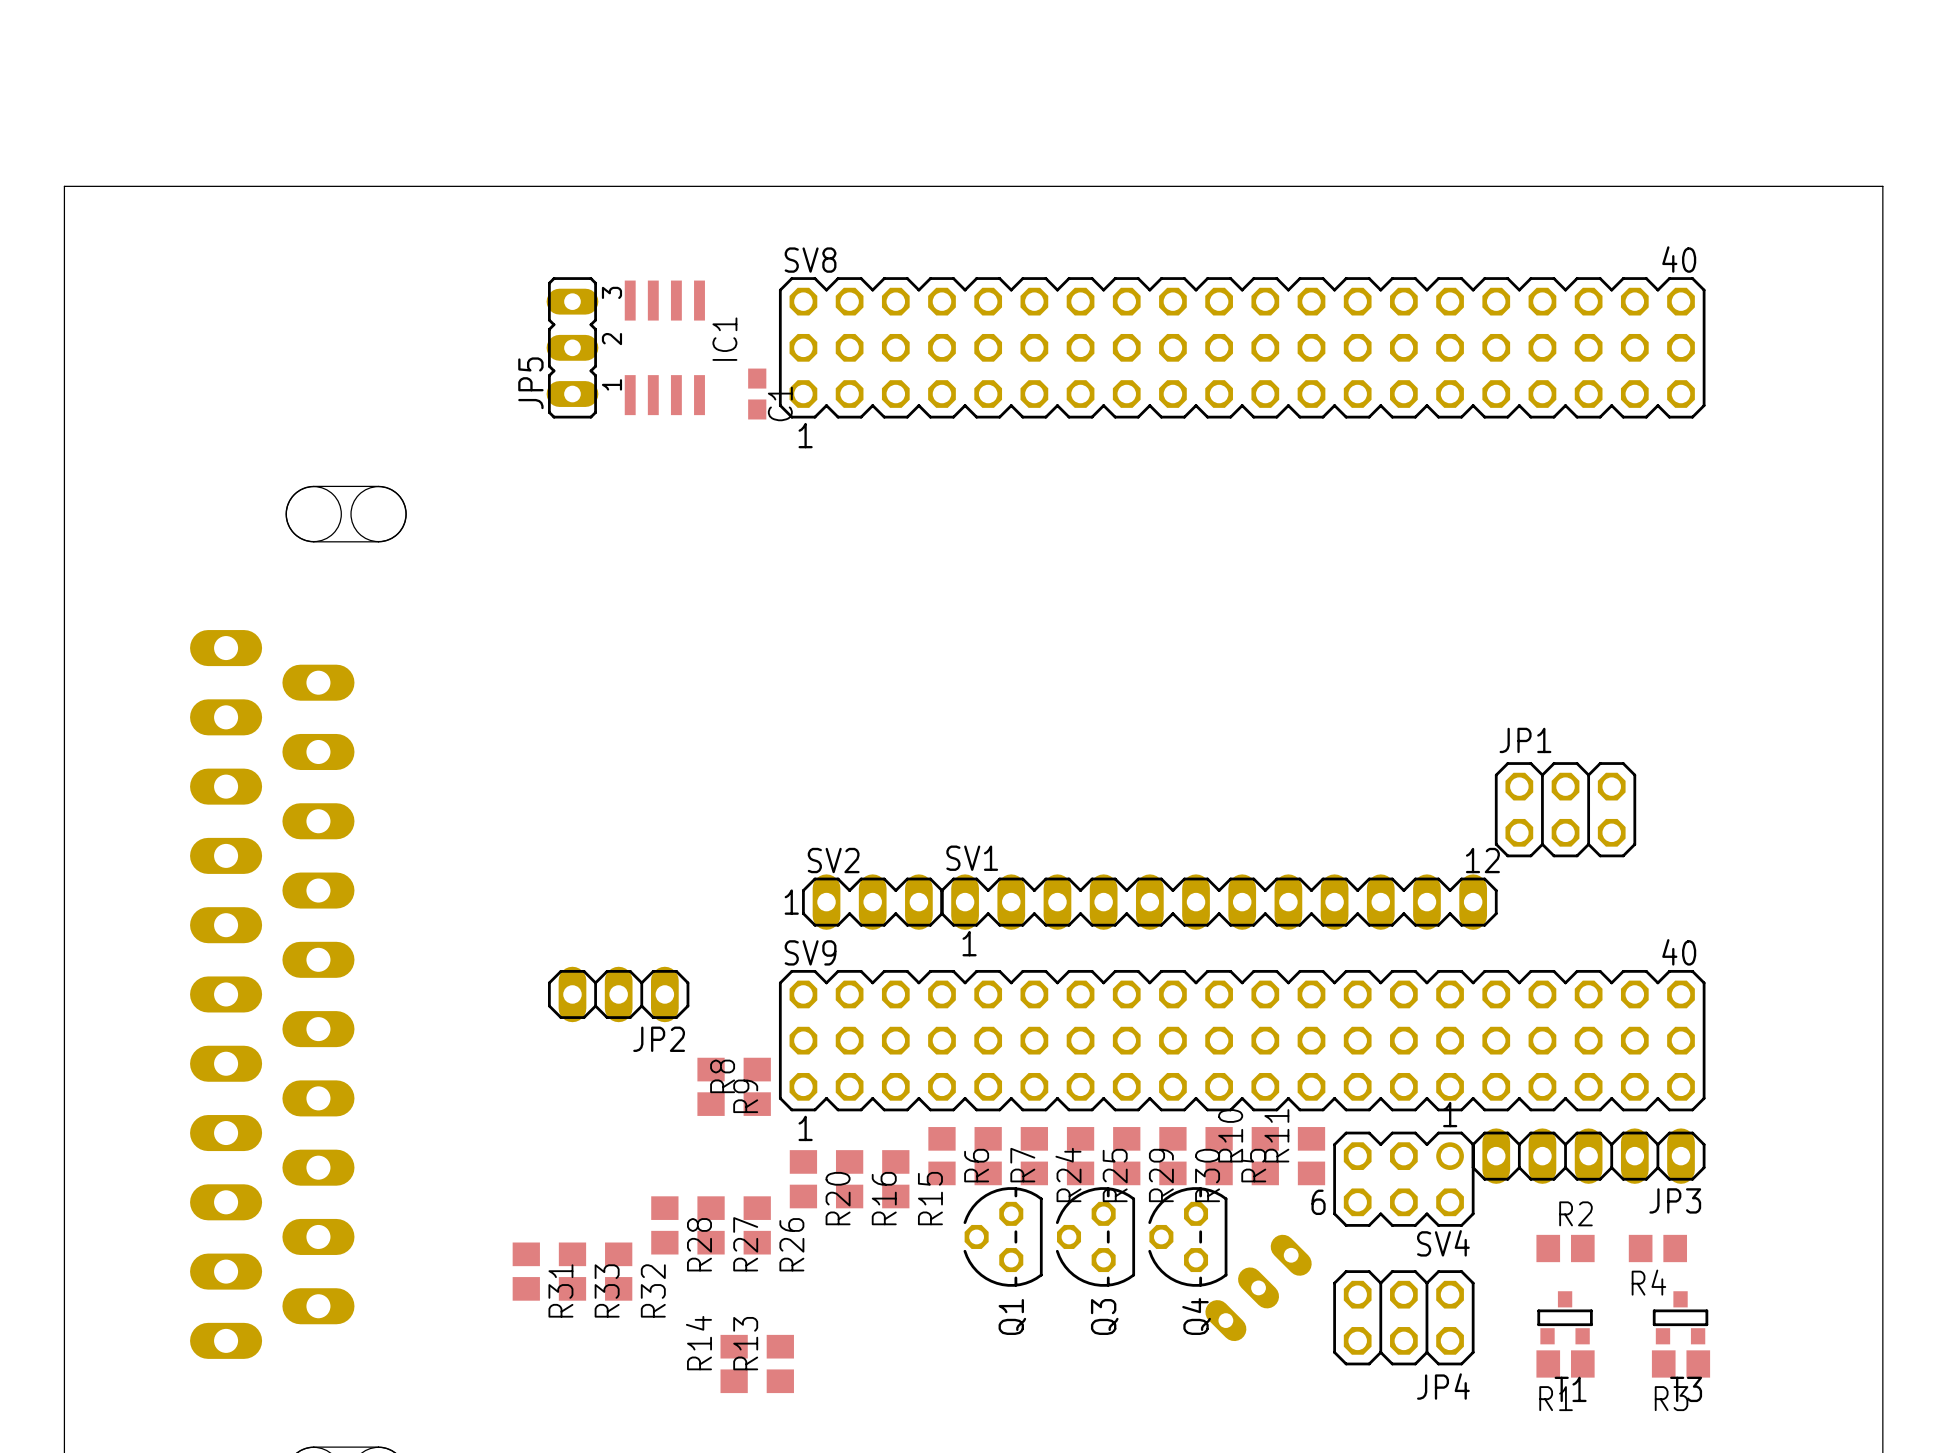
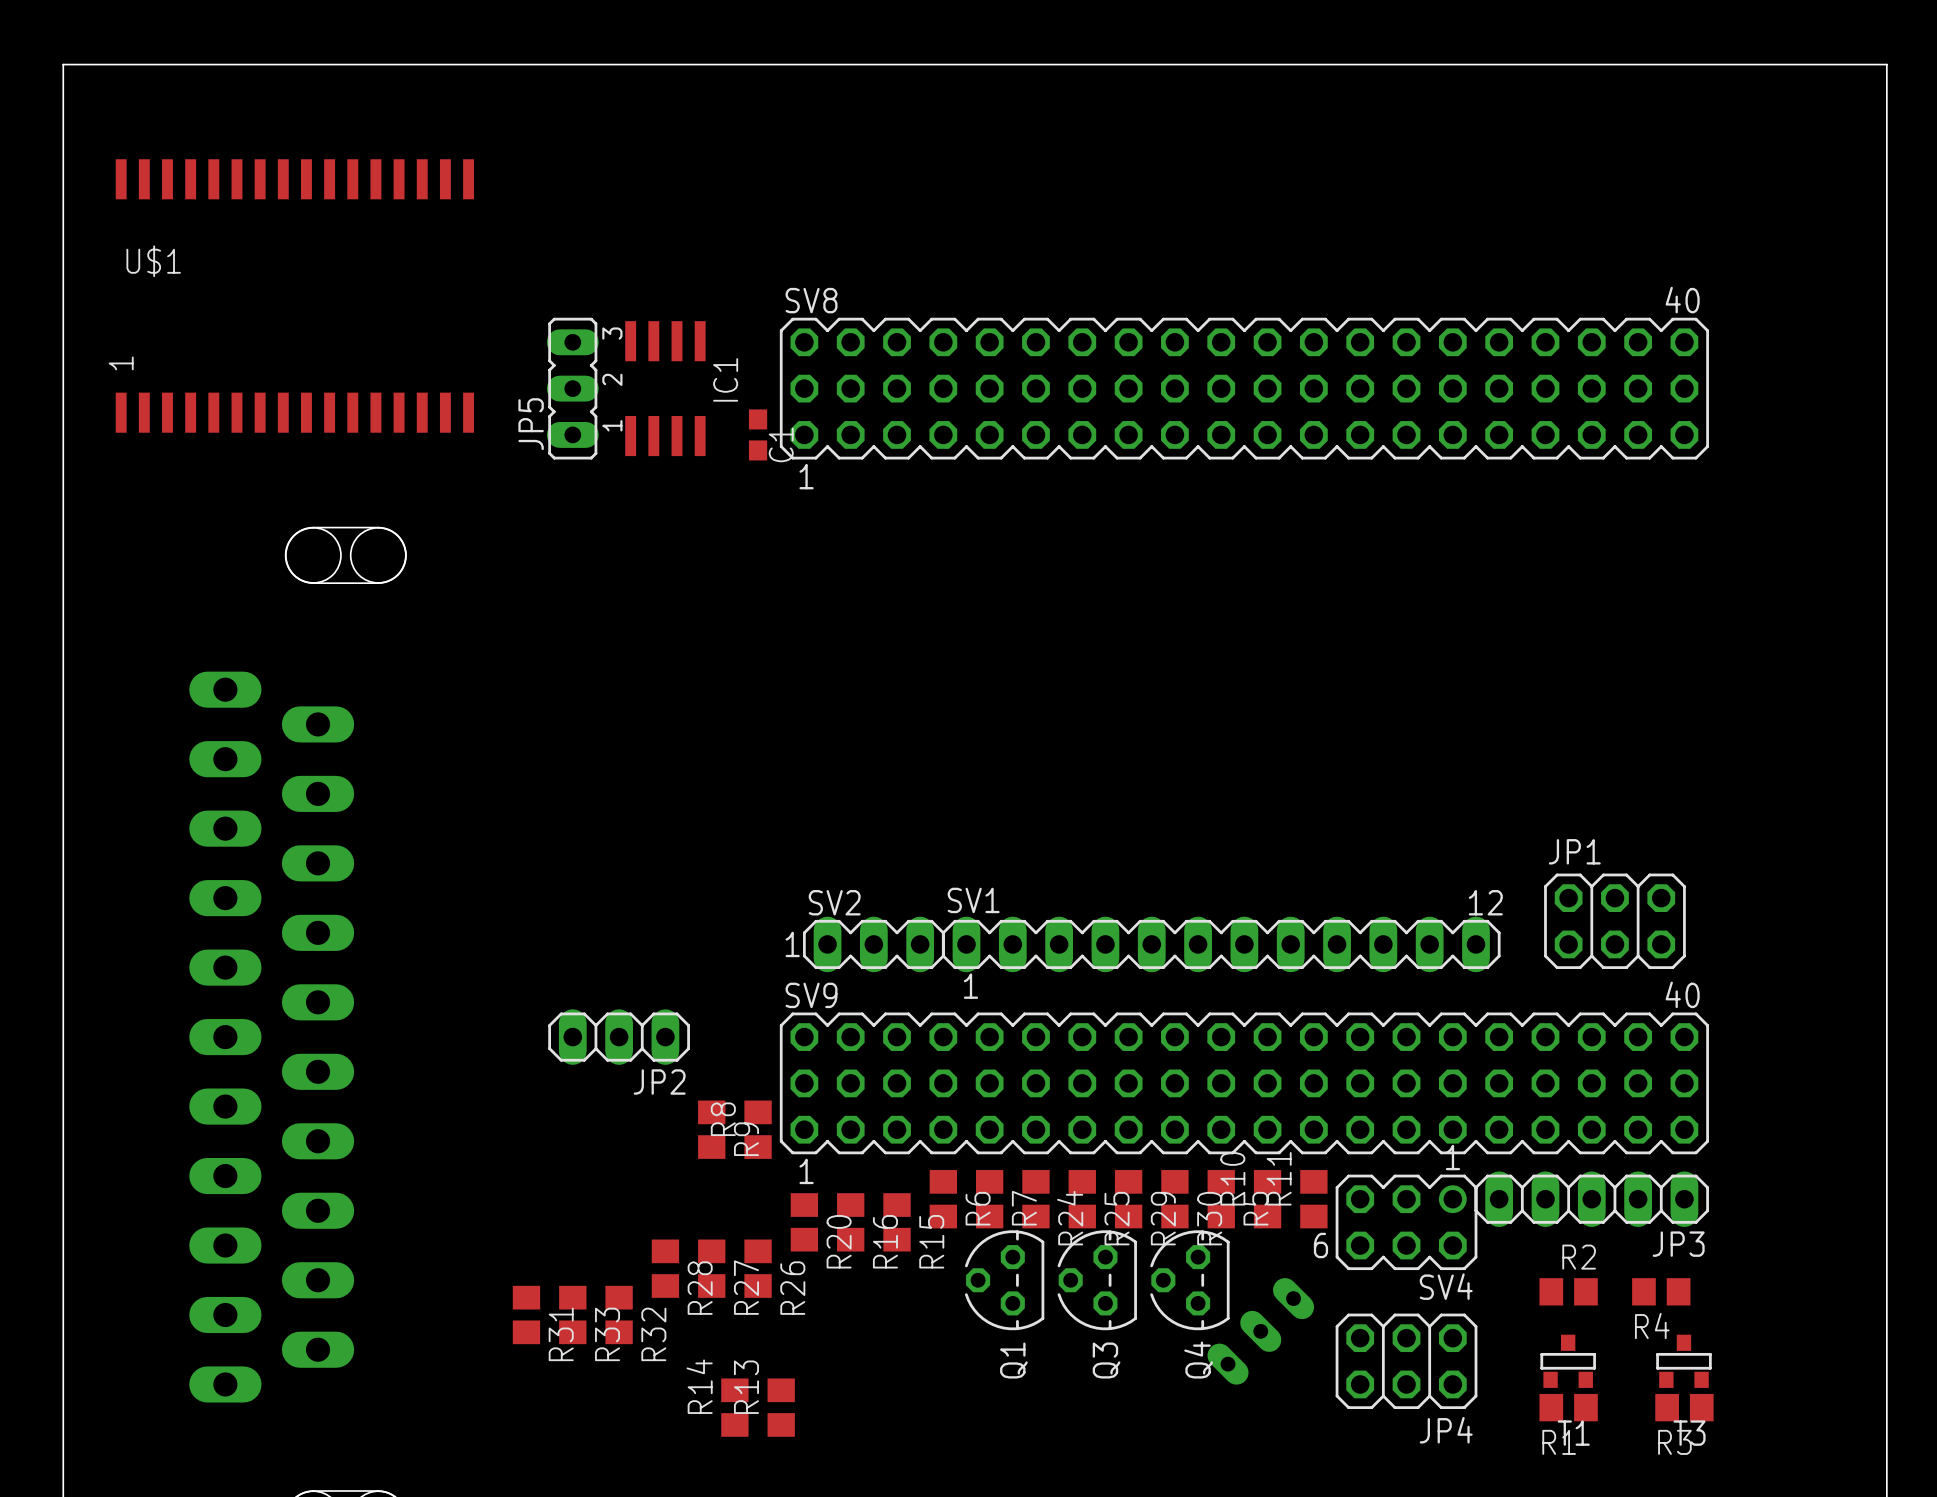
board edge: (64, 186) (1882, 186) -> (63, 226) (63, 64) (1886, 64) (1886, 226)
U$1: none -> (294, 295)
JP1 position: (1565, 809) -> (1614, 921)

